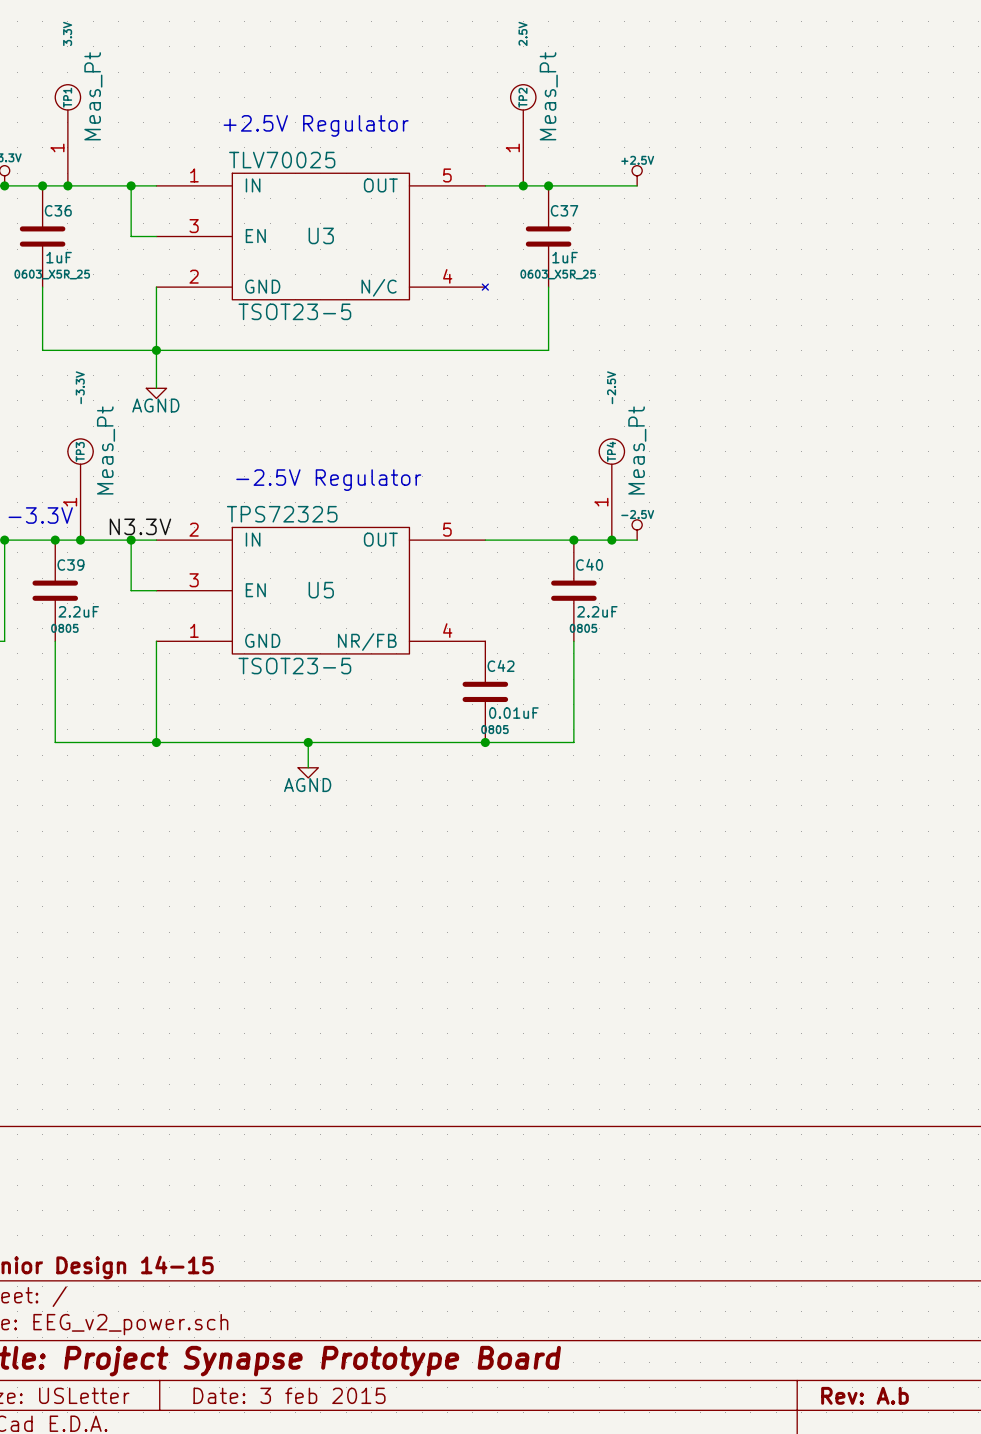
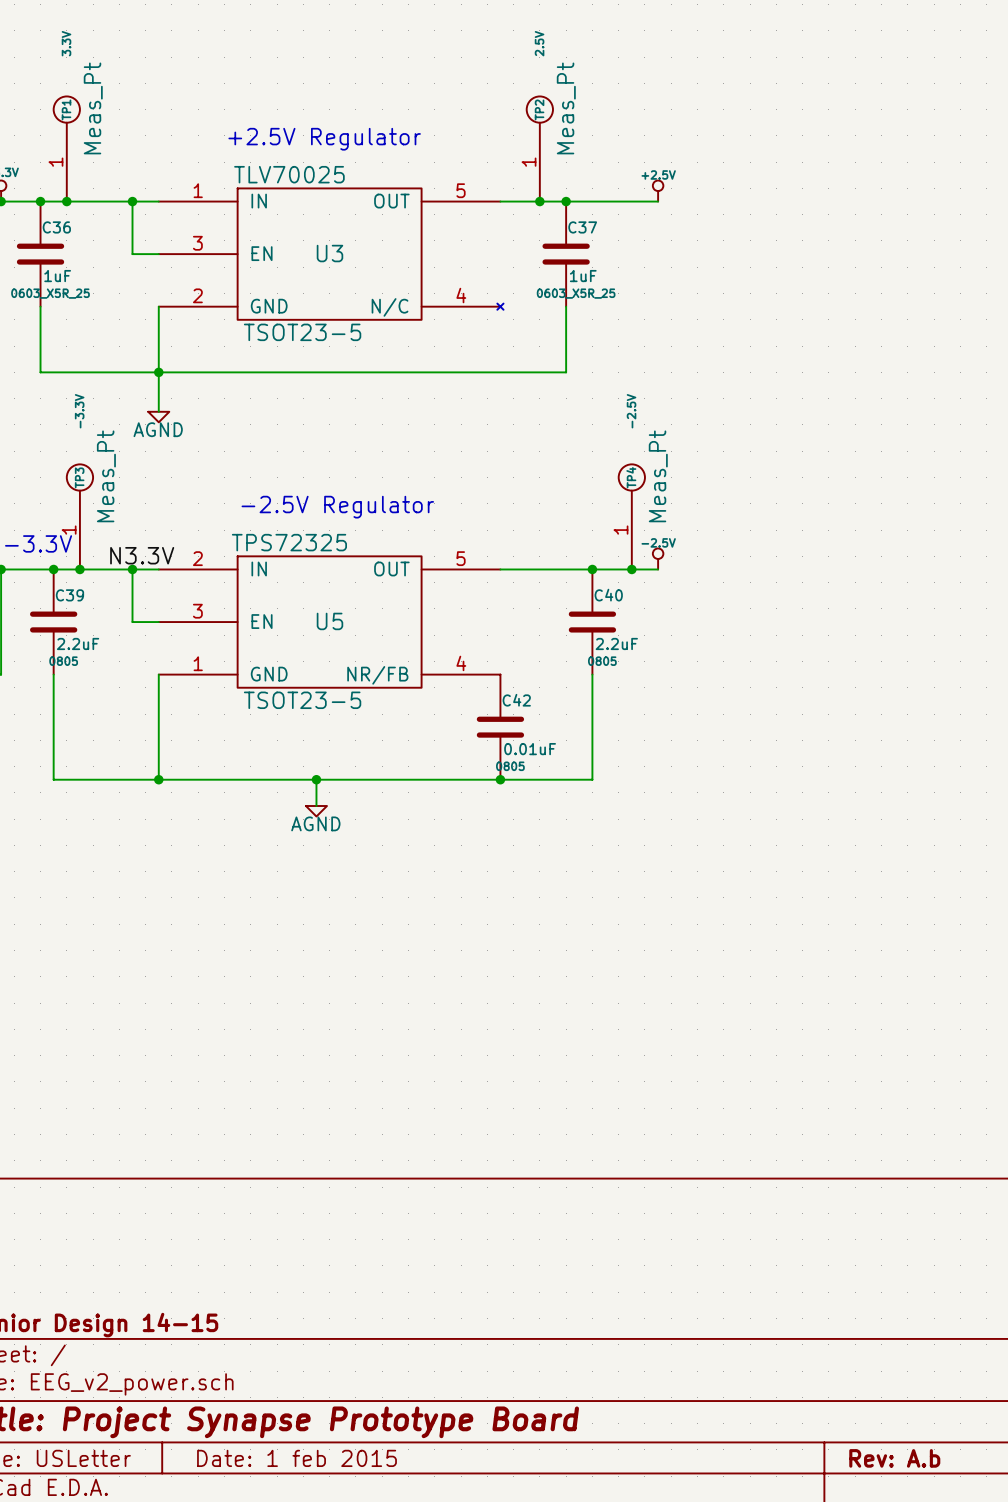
title block: Date: 3 feb 2015 (289, 1395) -> Date: 1 feb 2015 (297, 1458)

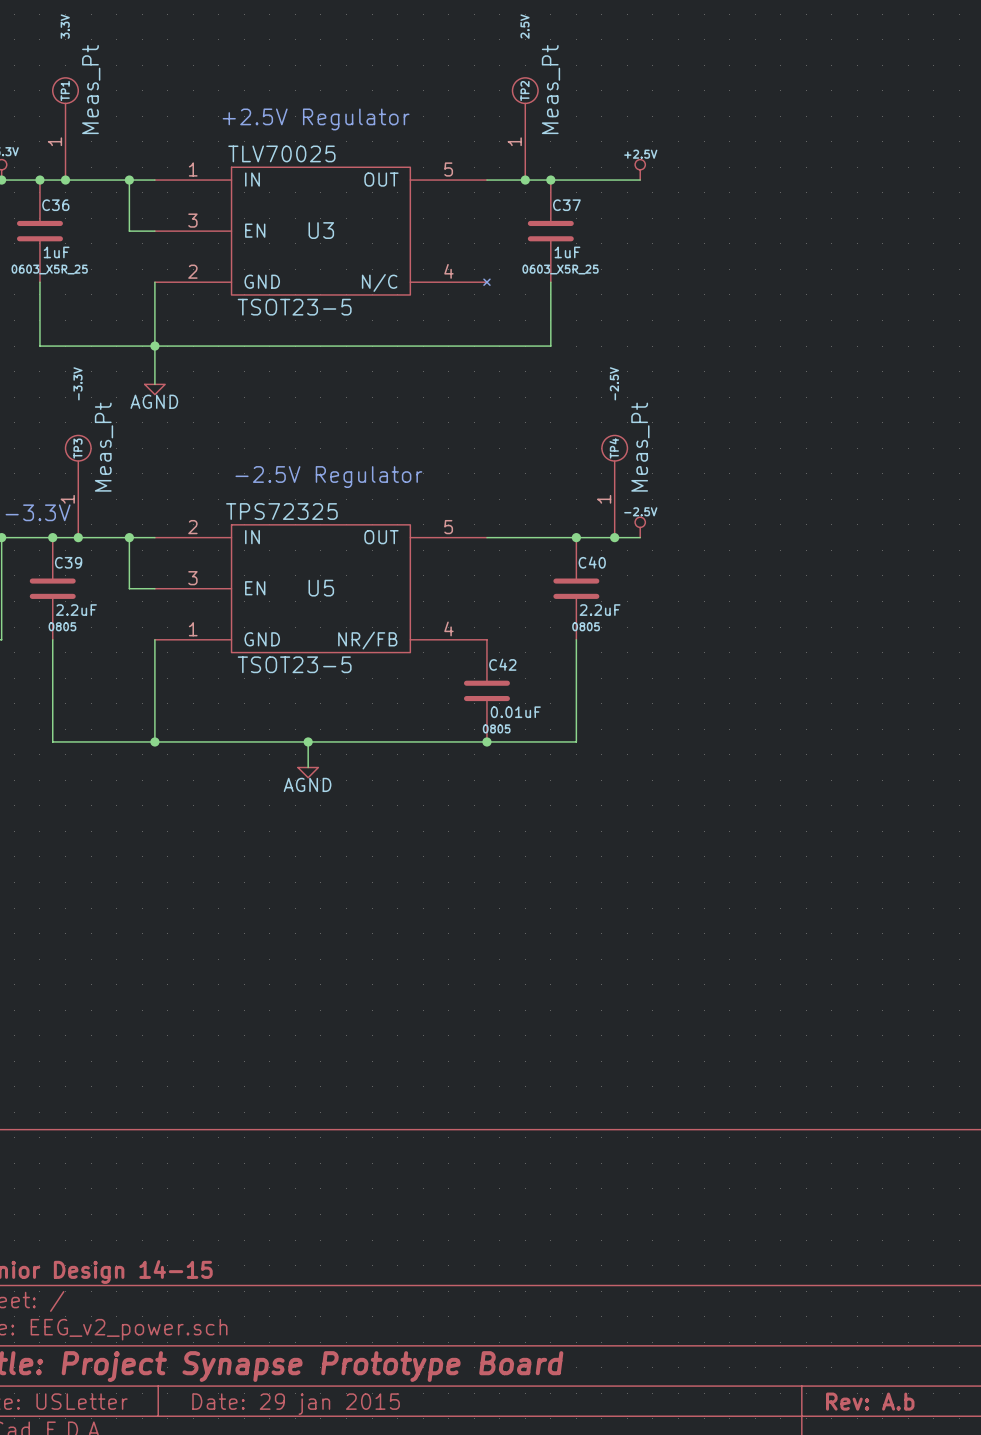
label: N3.3V (142, 555) -> none
title block: Date: 1 feb 2015 (297, 1458) -> Date: 29 jan 2015 (296, 1404)

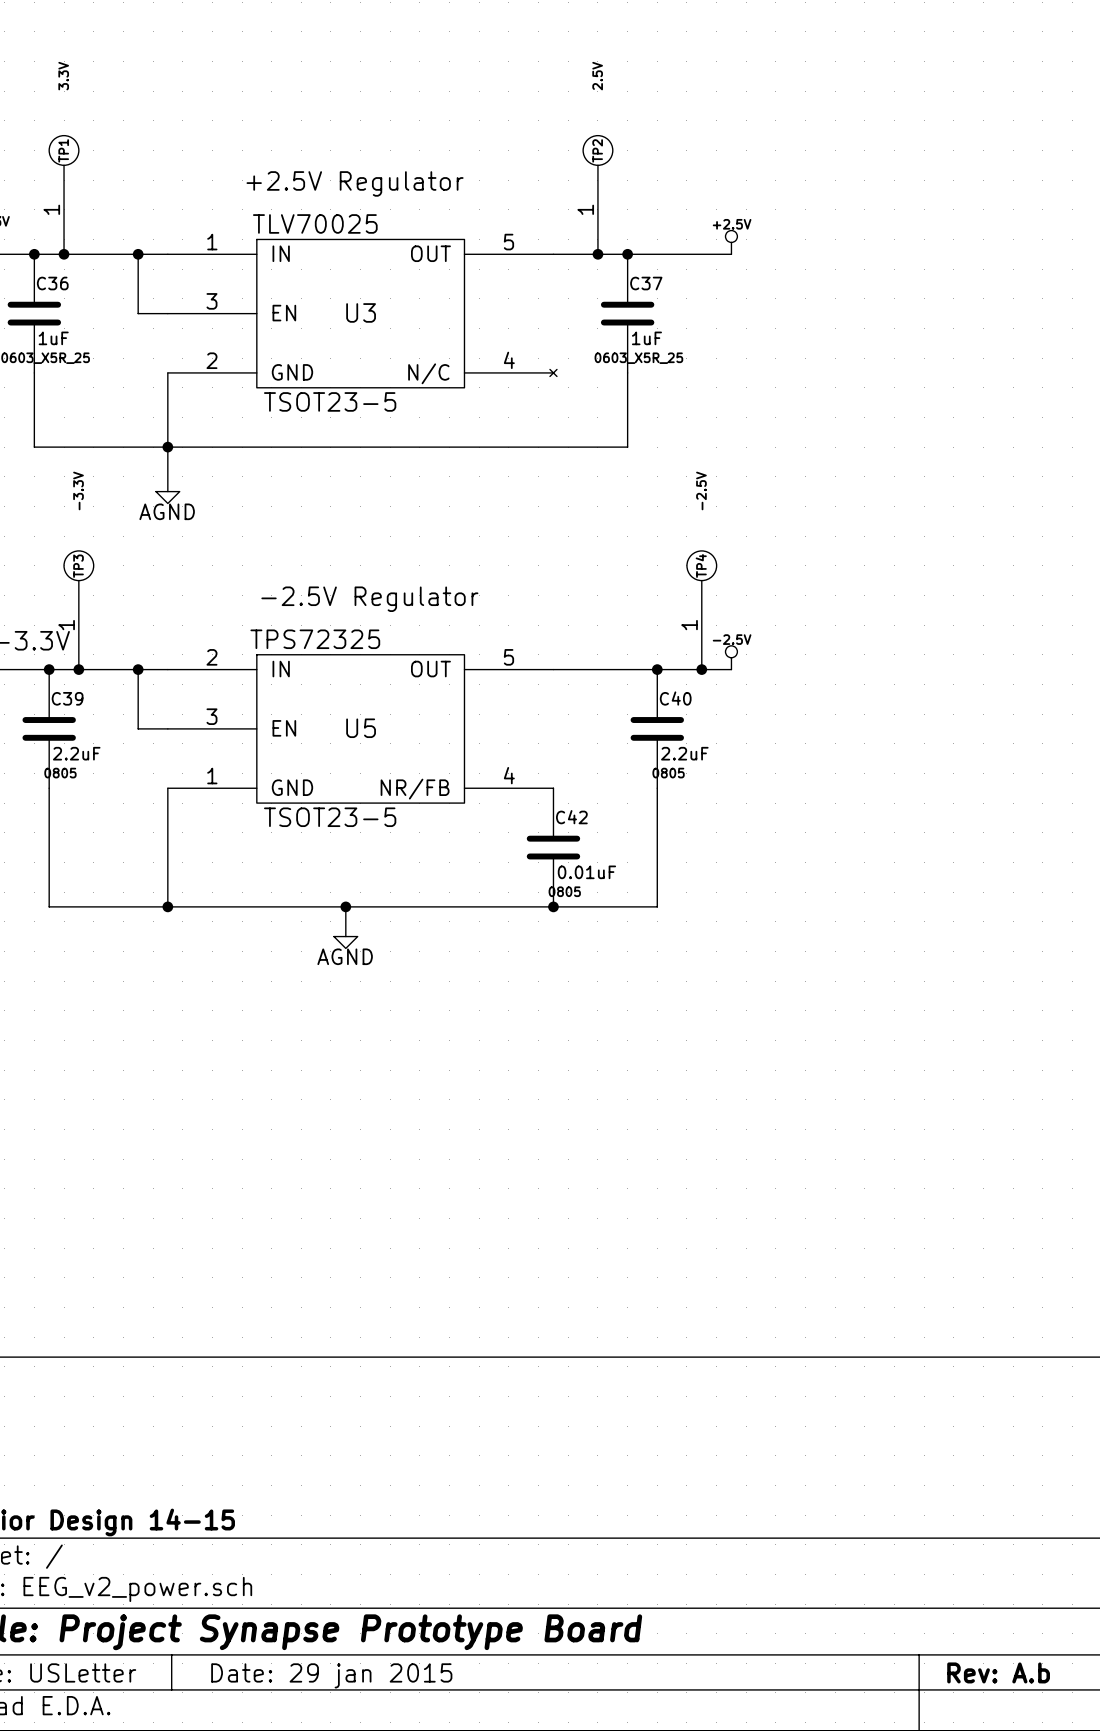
TP1 text: Meas_Pt (91, 89) -> none
TP2 text: Meas_Pt (550, 89) -> none
TP3 text: Meas_Pt (103, 447) -> none
TP4 text: Meas_Pt (640, 447) -> none

